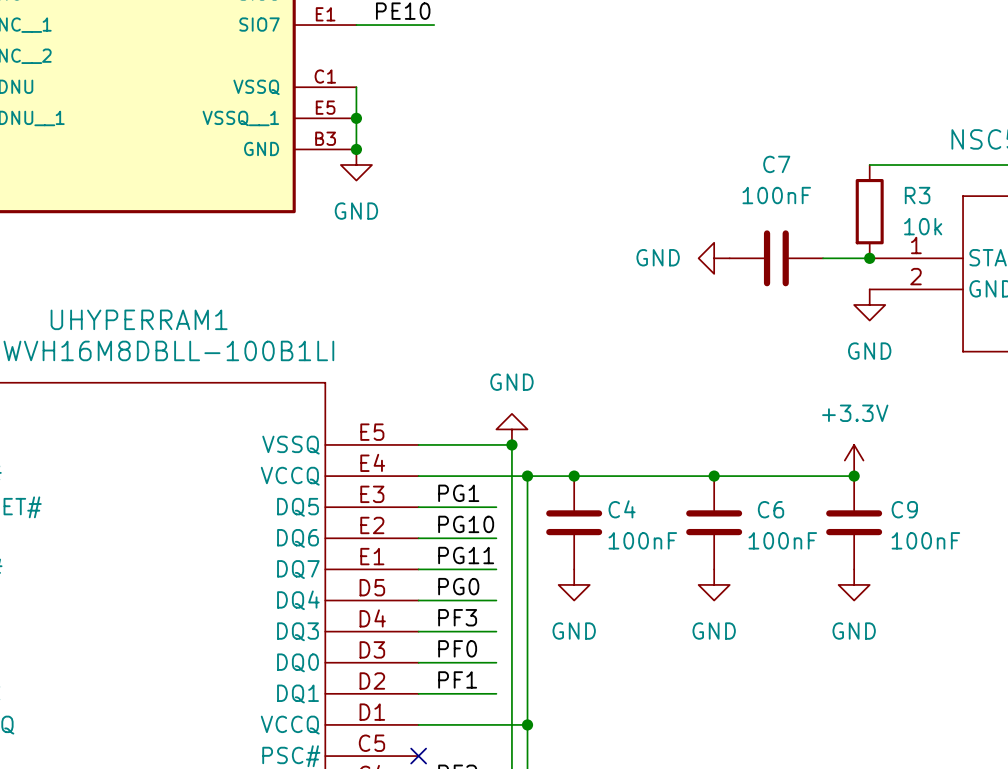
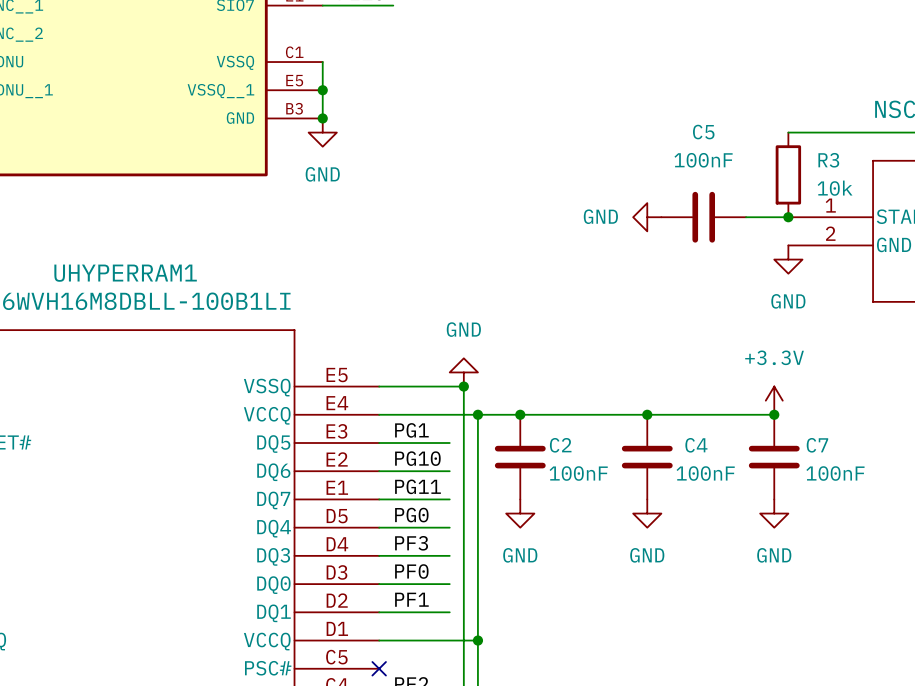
C7 name: C7 (776, 164) -> C5 (703, 132)
C4 name: C4 (622, 509) -> C2 (560, 445)
C6 name: C6 (771, 509) -> C4 (696, 445)
C9 name: C9 (904, 509) -> C7 (817, 445)

